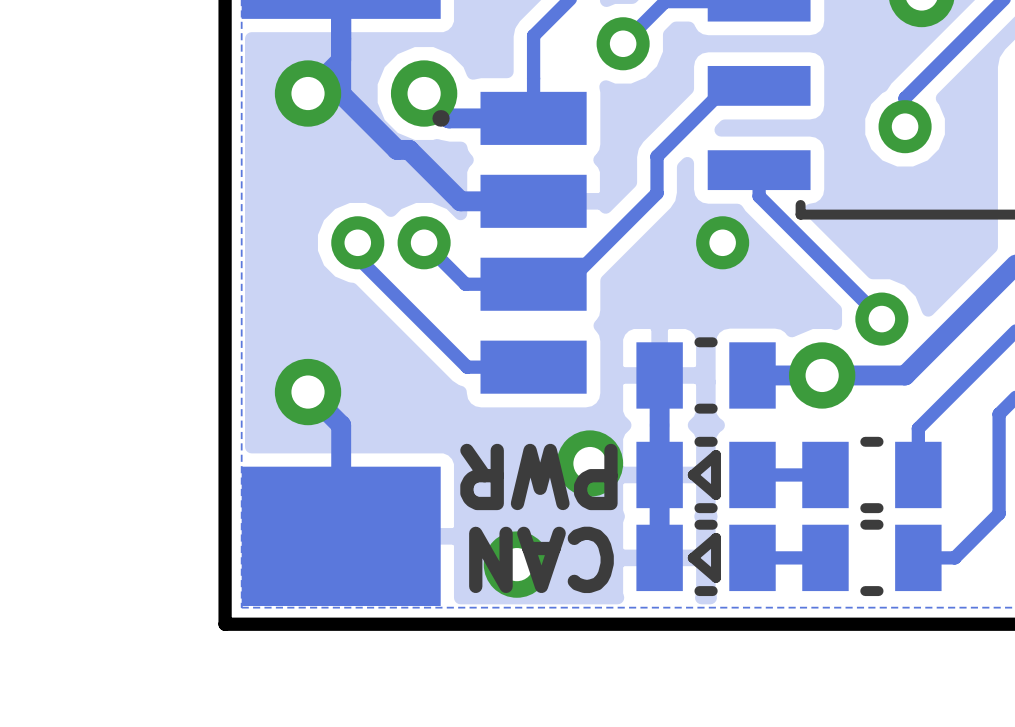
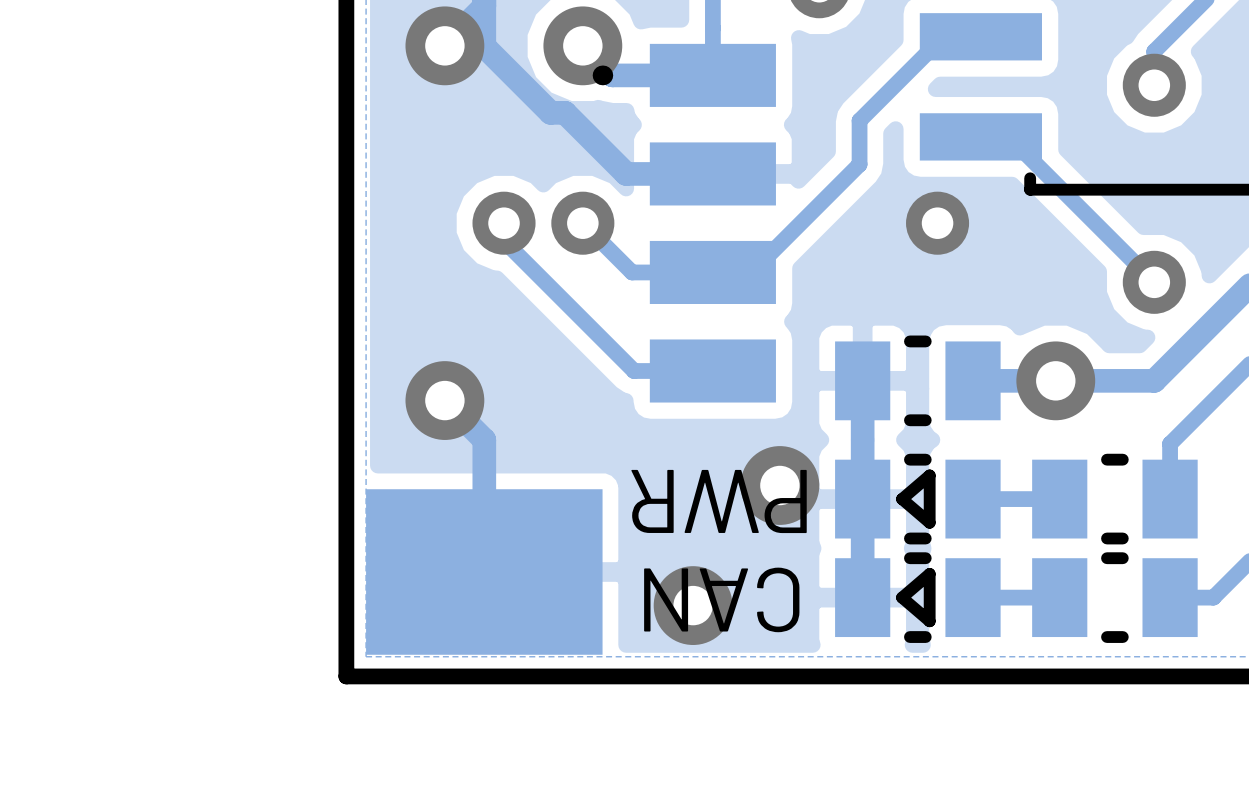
track: (759, 170) (759, 196) (881, 319) -> (980, 136) (1008, 136) (1154, 282)
via position: (881, 319) -> (1154, 282)

